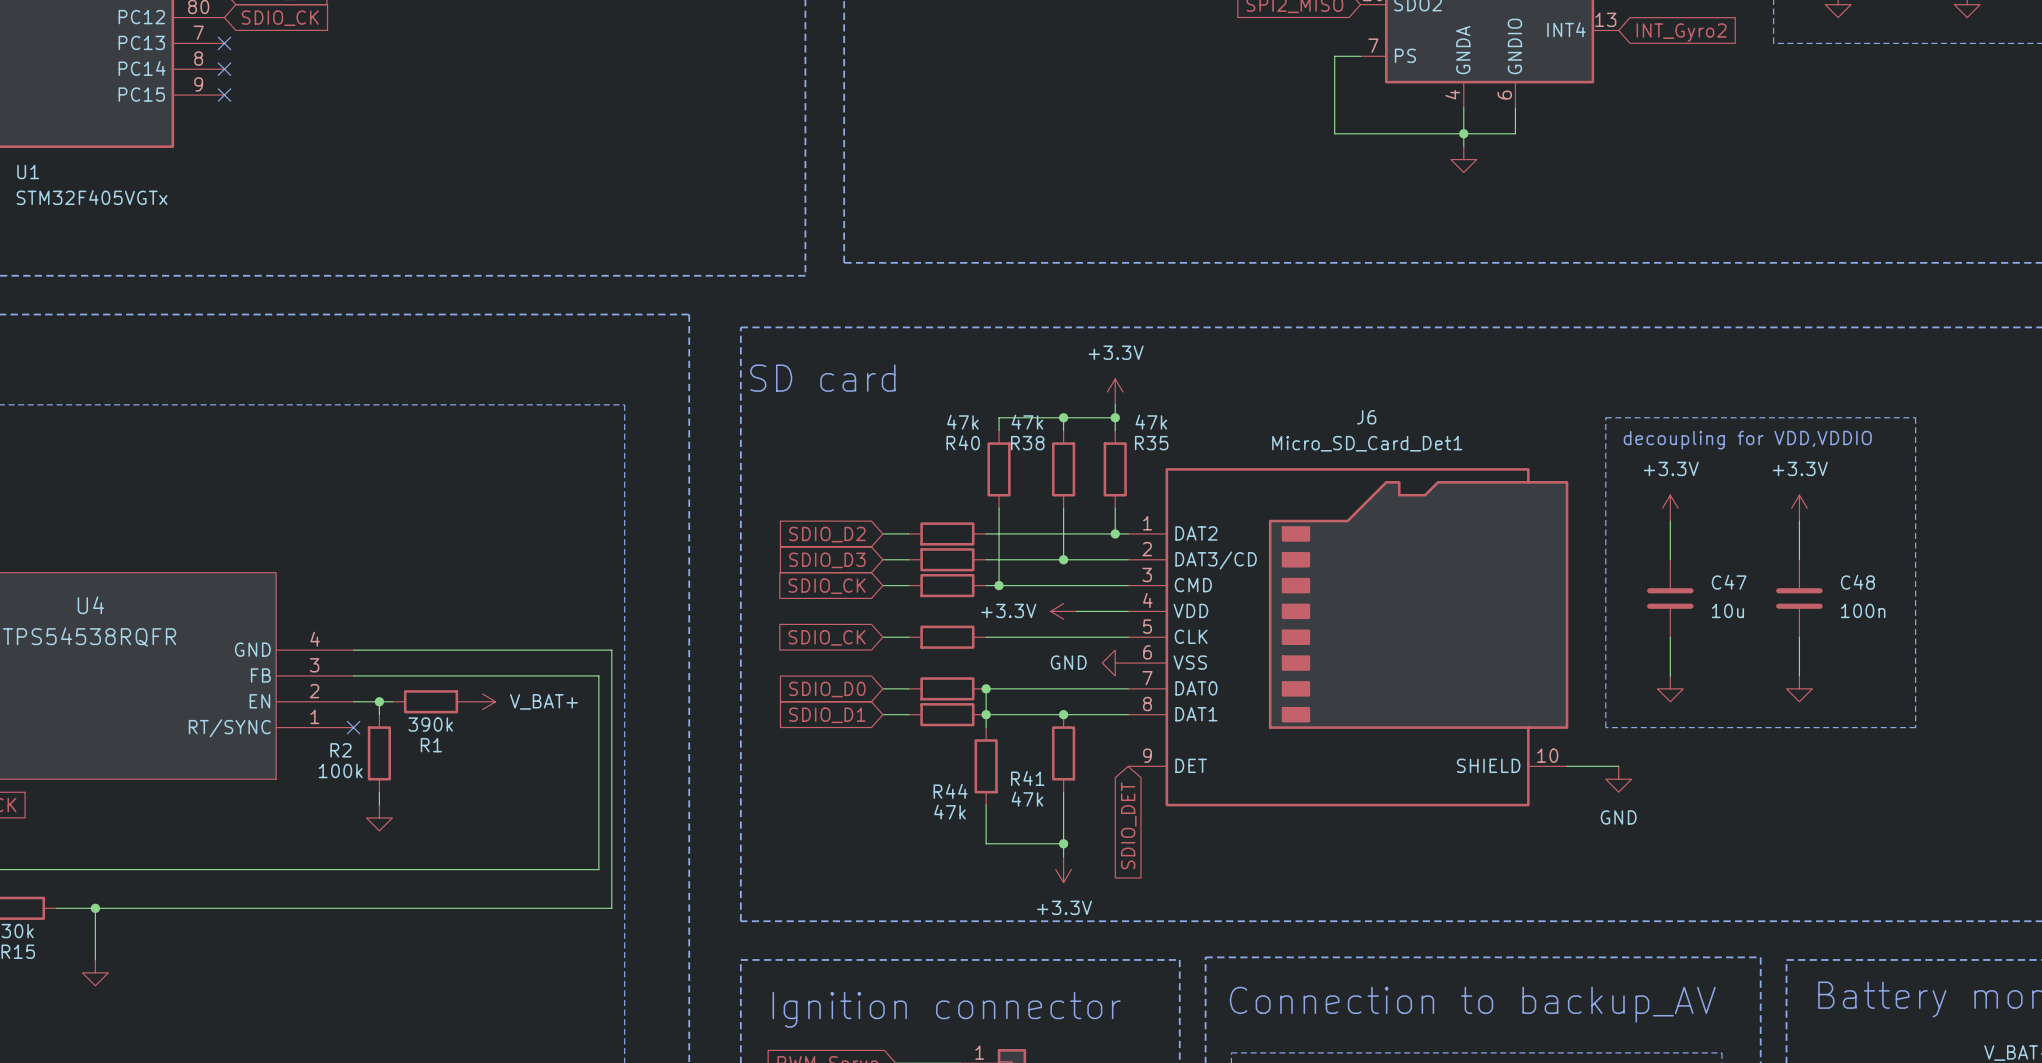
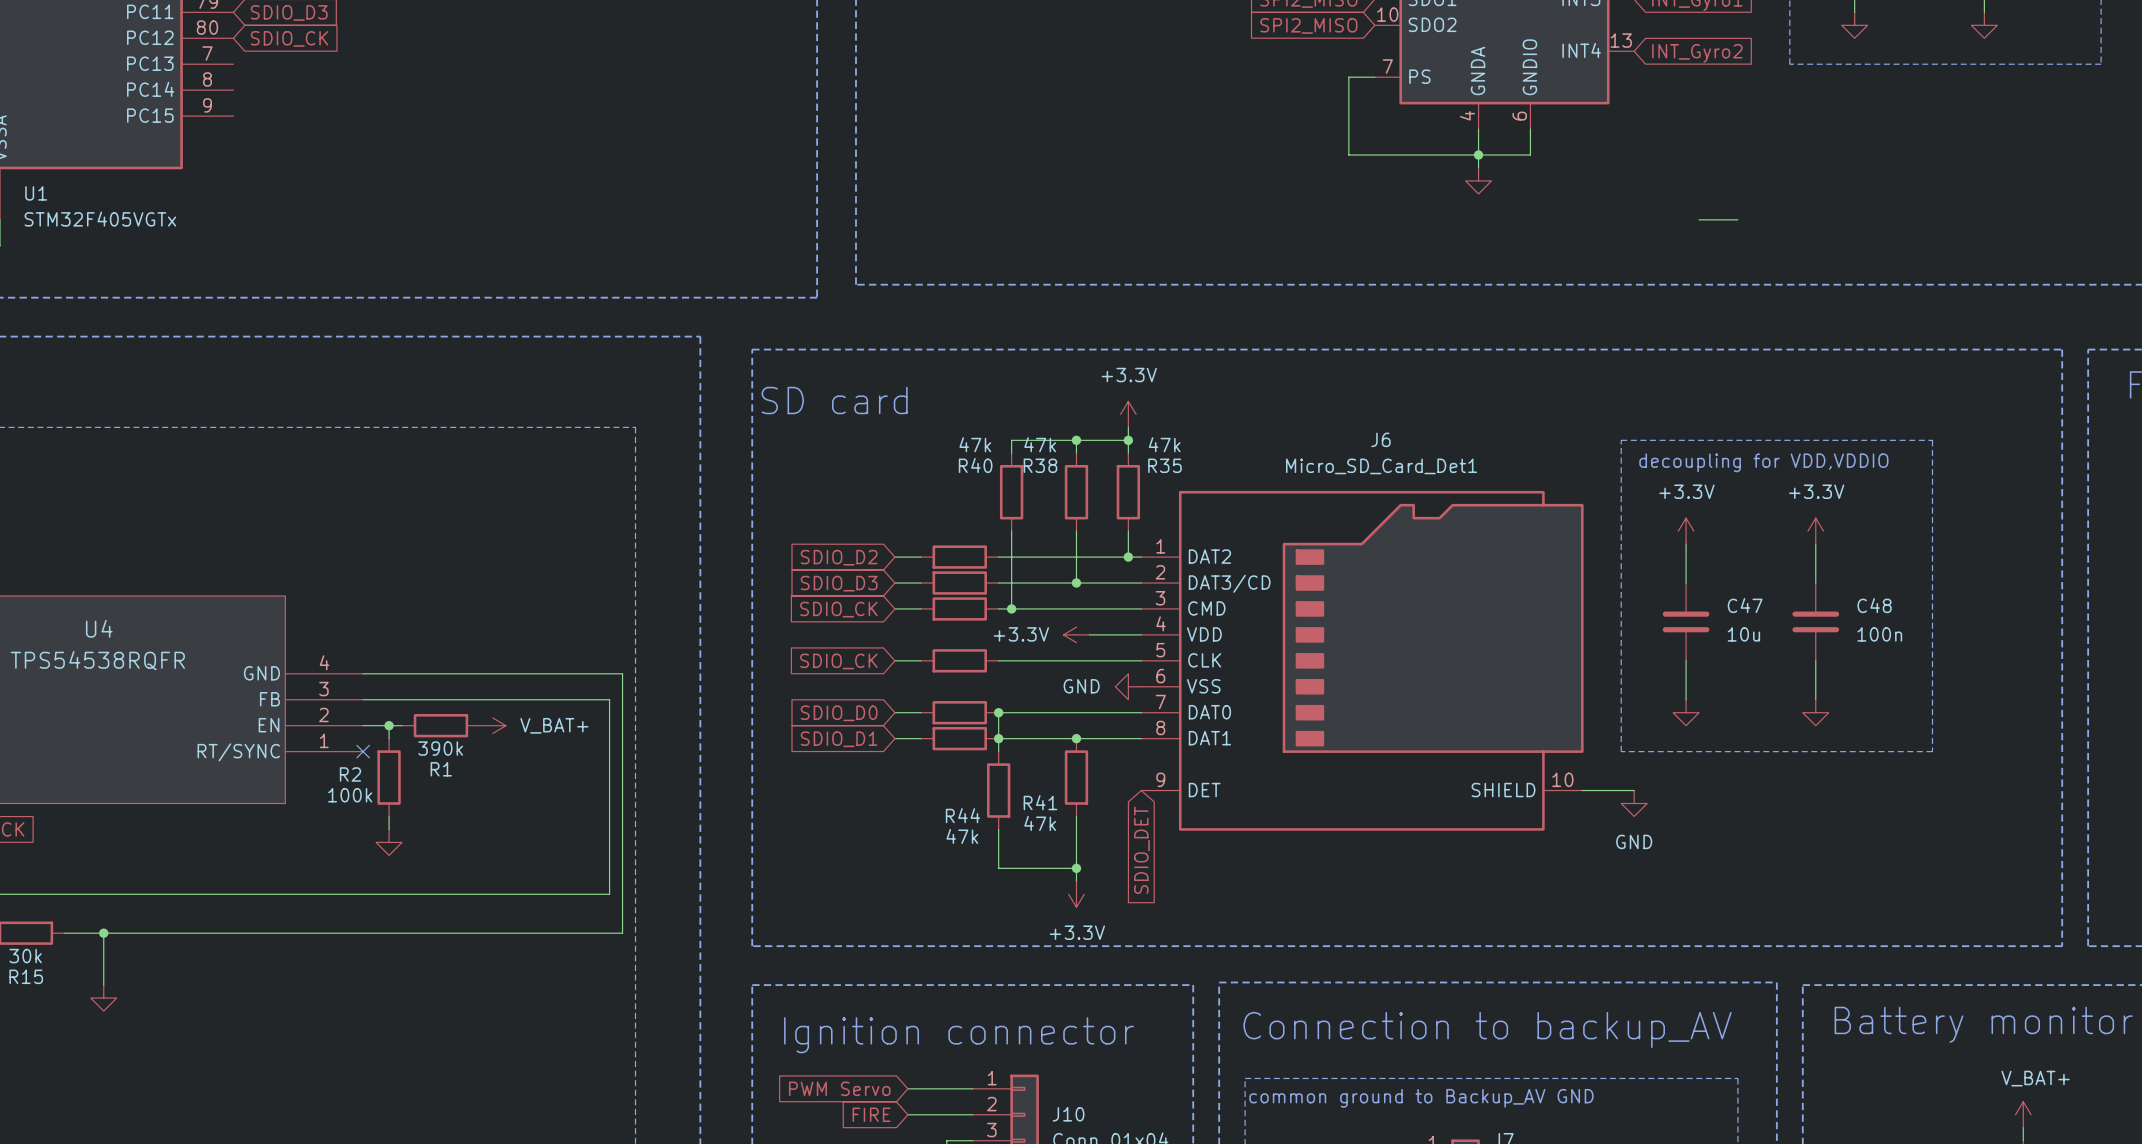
no-connect mark: (224, 43) -> none
no-connect mark: (224, 69) -> none
no-connect mark: (224, 95) -> none
wire: none -> (1699, 219) (1737, 219)

